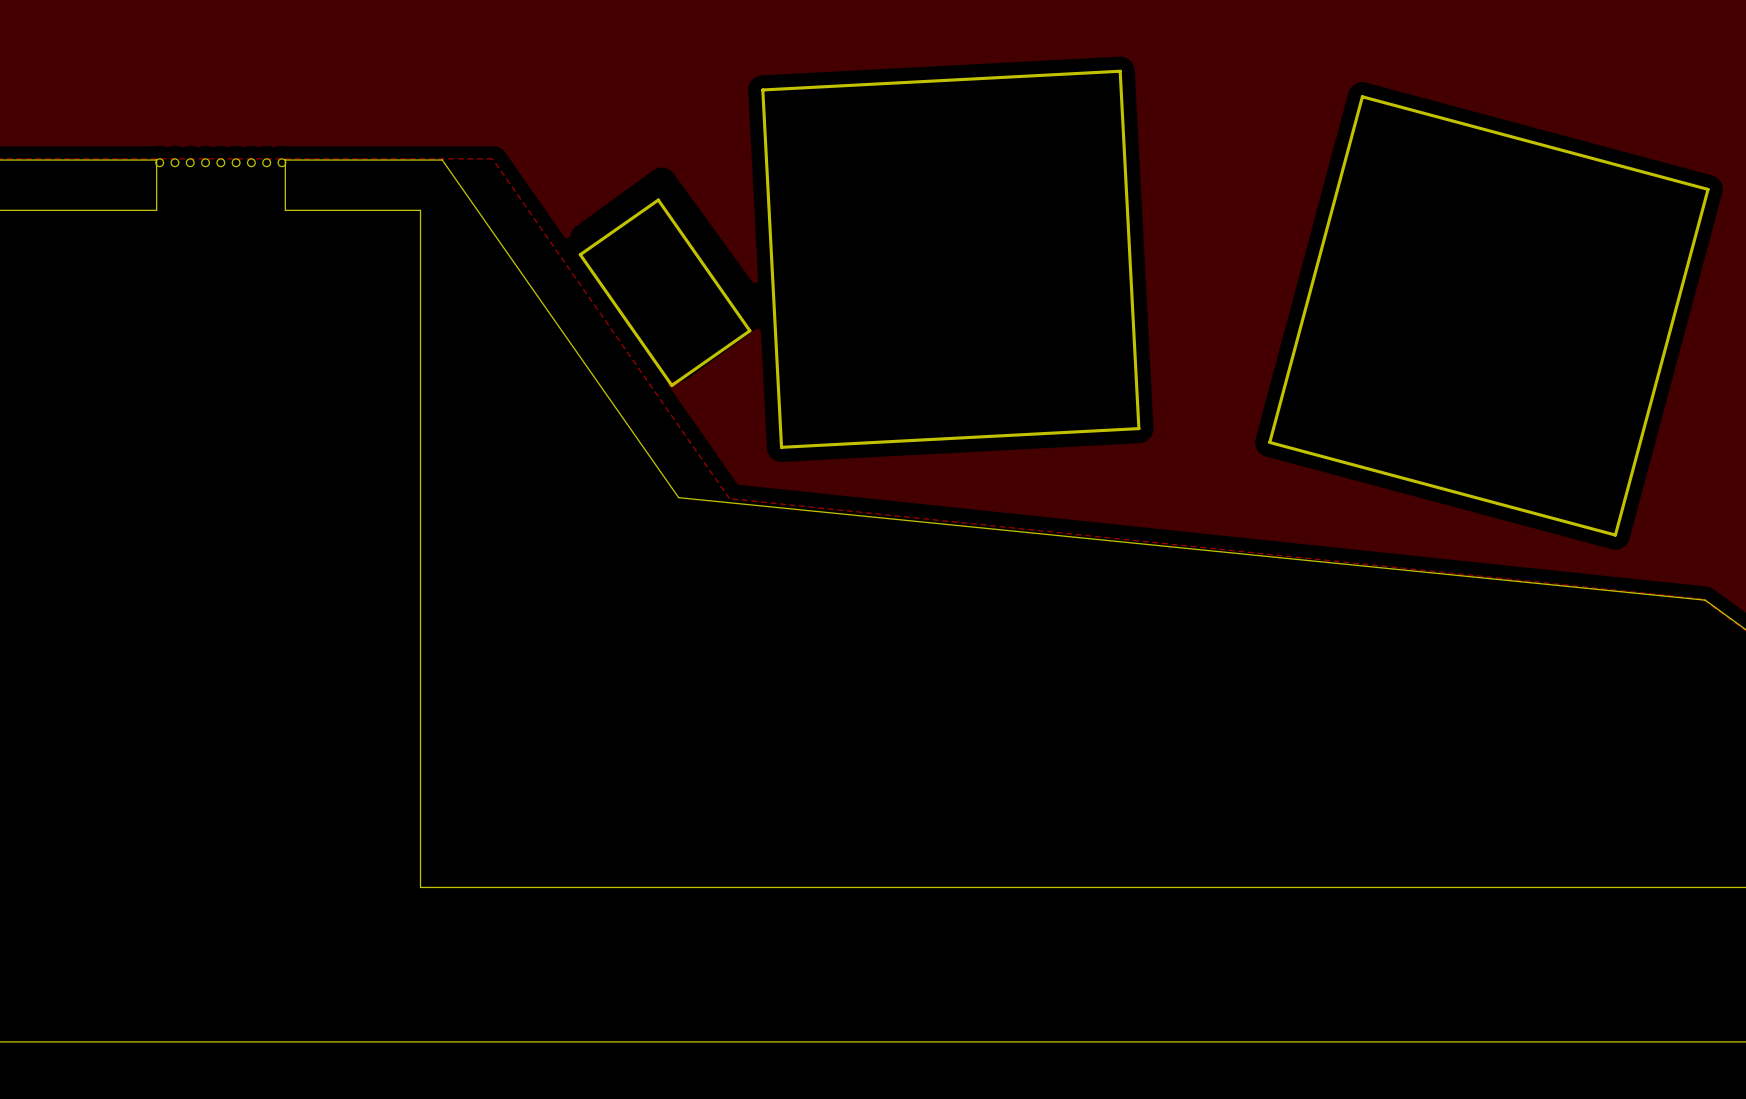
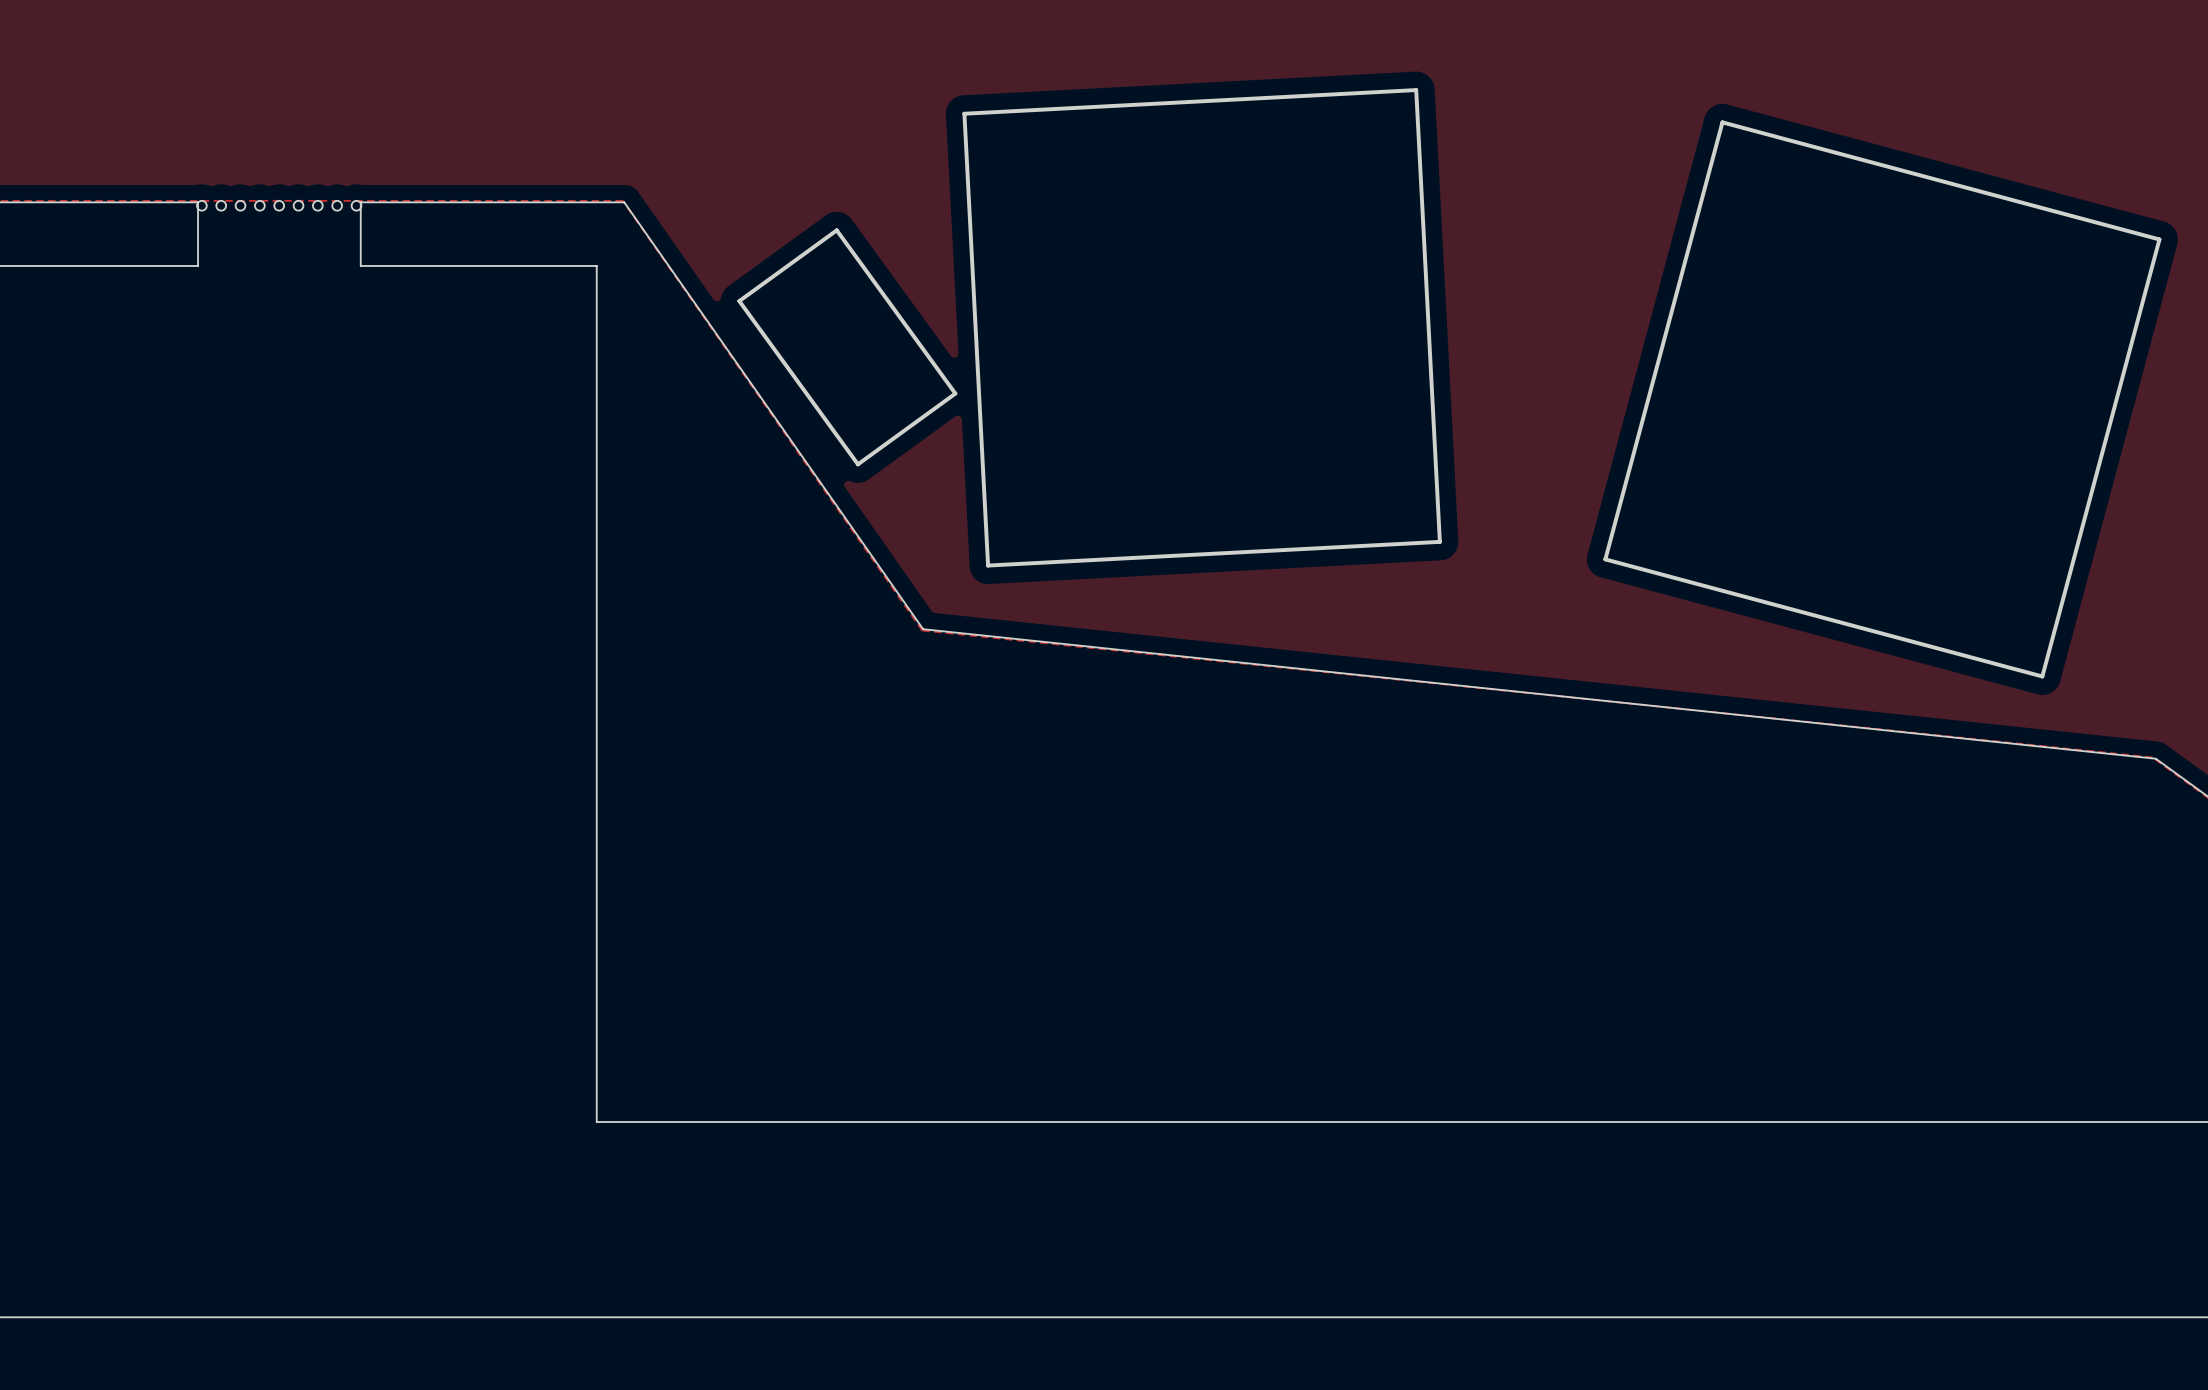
board edge: (442, 160) (678, 497) (1705, 600) -> (559, 202) (624, 202) (923, 629) (2155, 758)
drawing shape: [578, 198, 752, 387] -> [737, 228, 958, 467]
board edge: (420, 210) (420, 887) (472, 887) -> (531, 265) (596, 265) (596, 1121)

